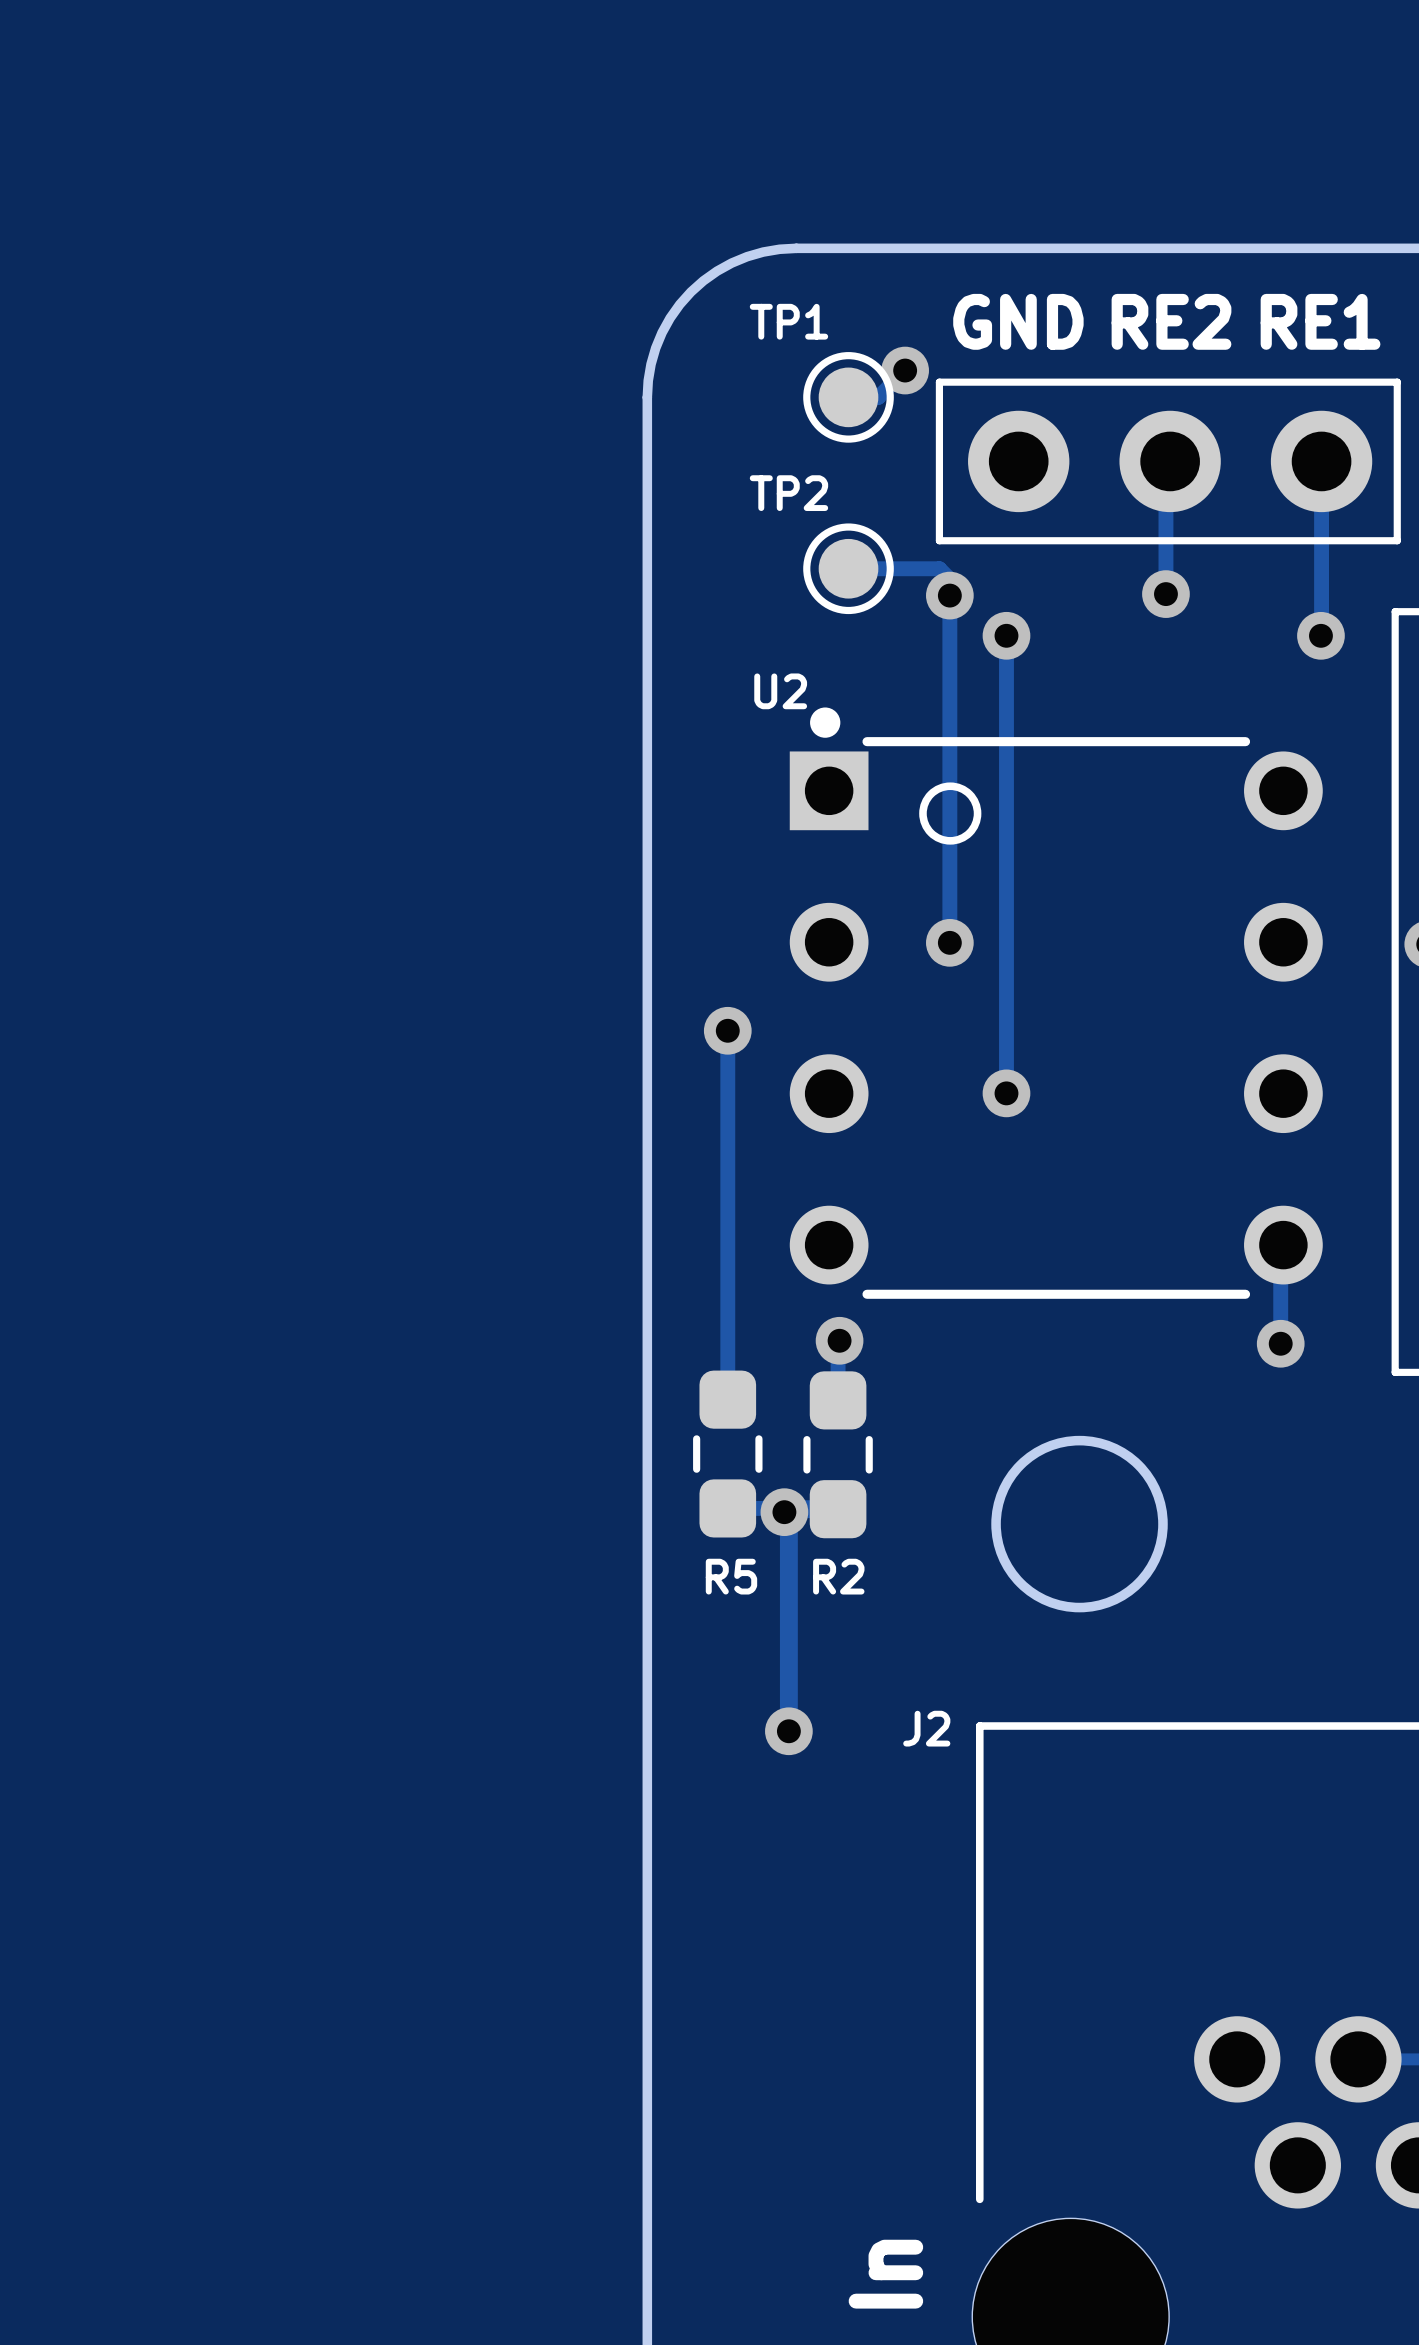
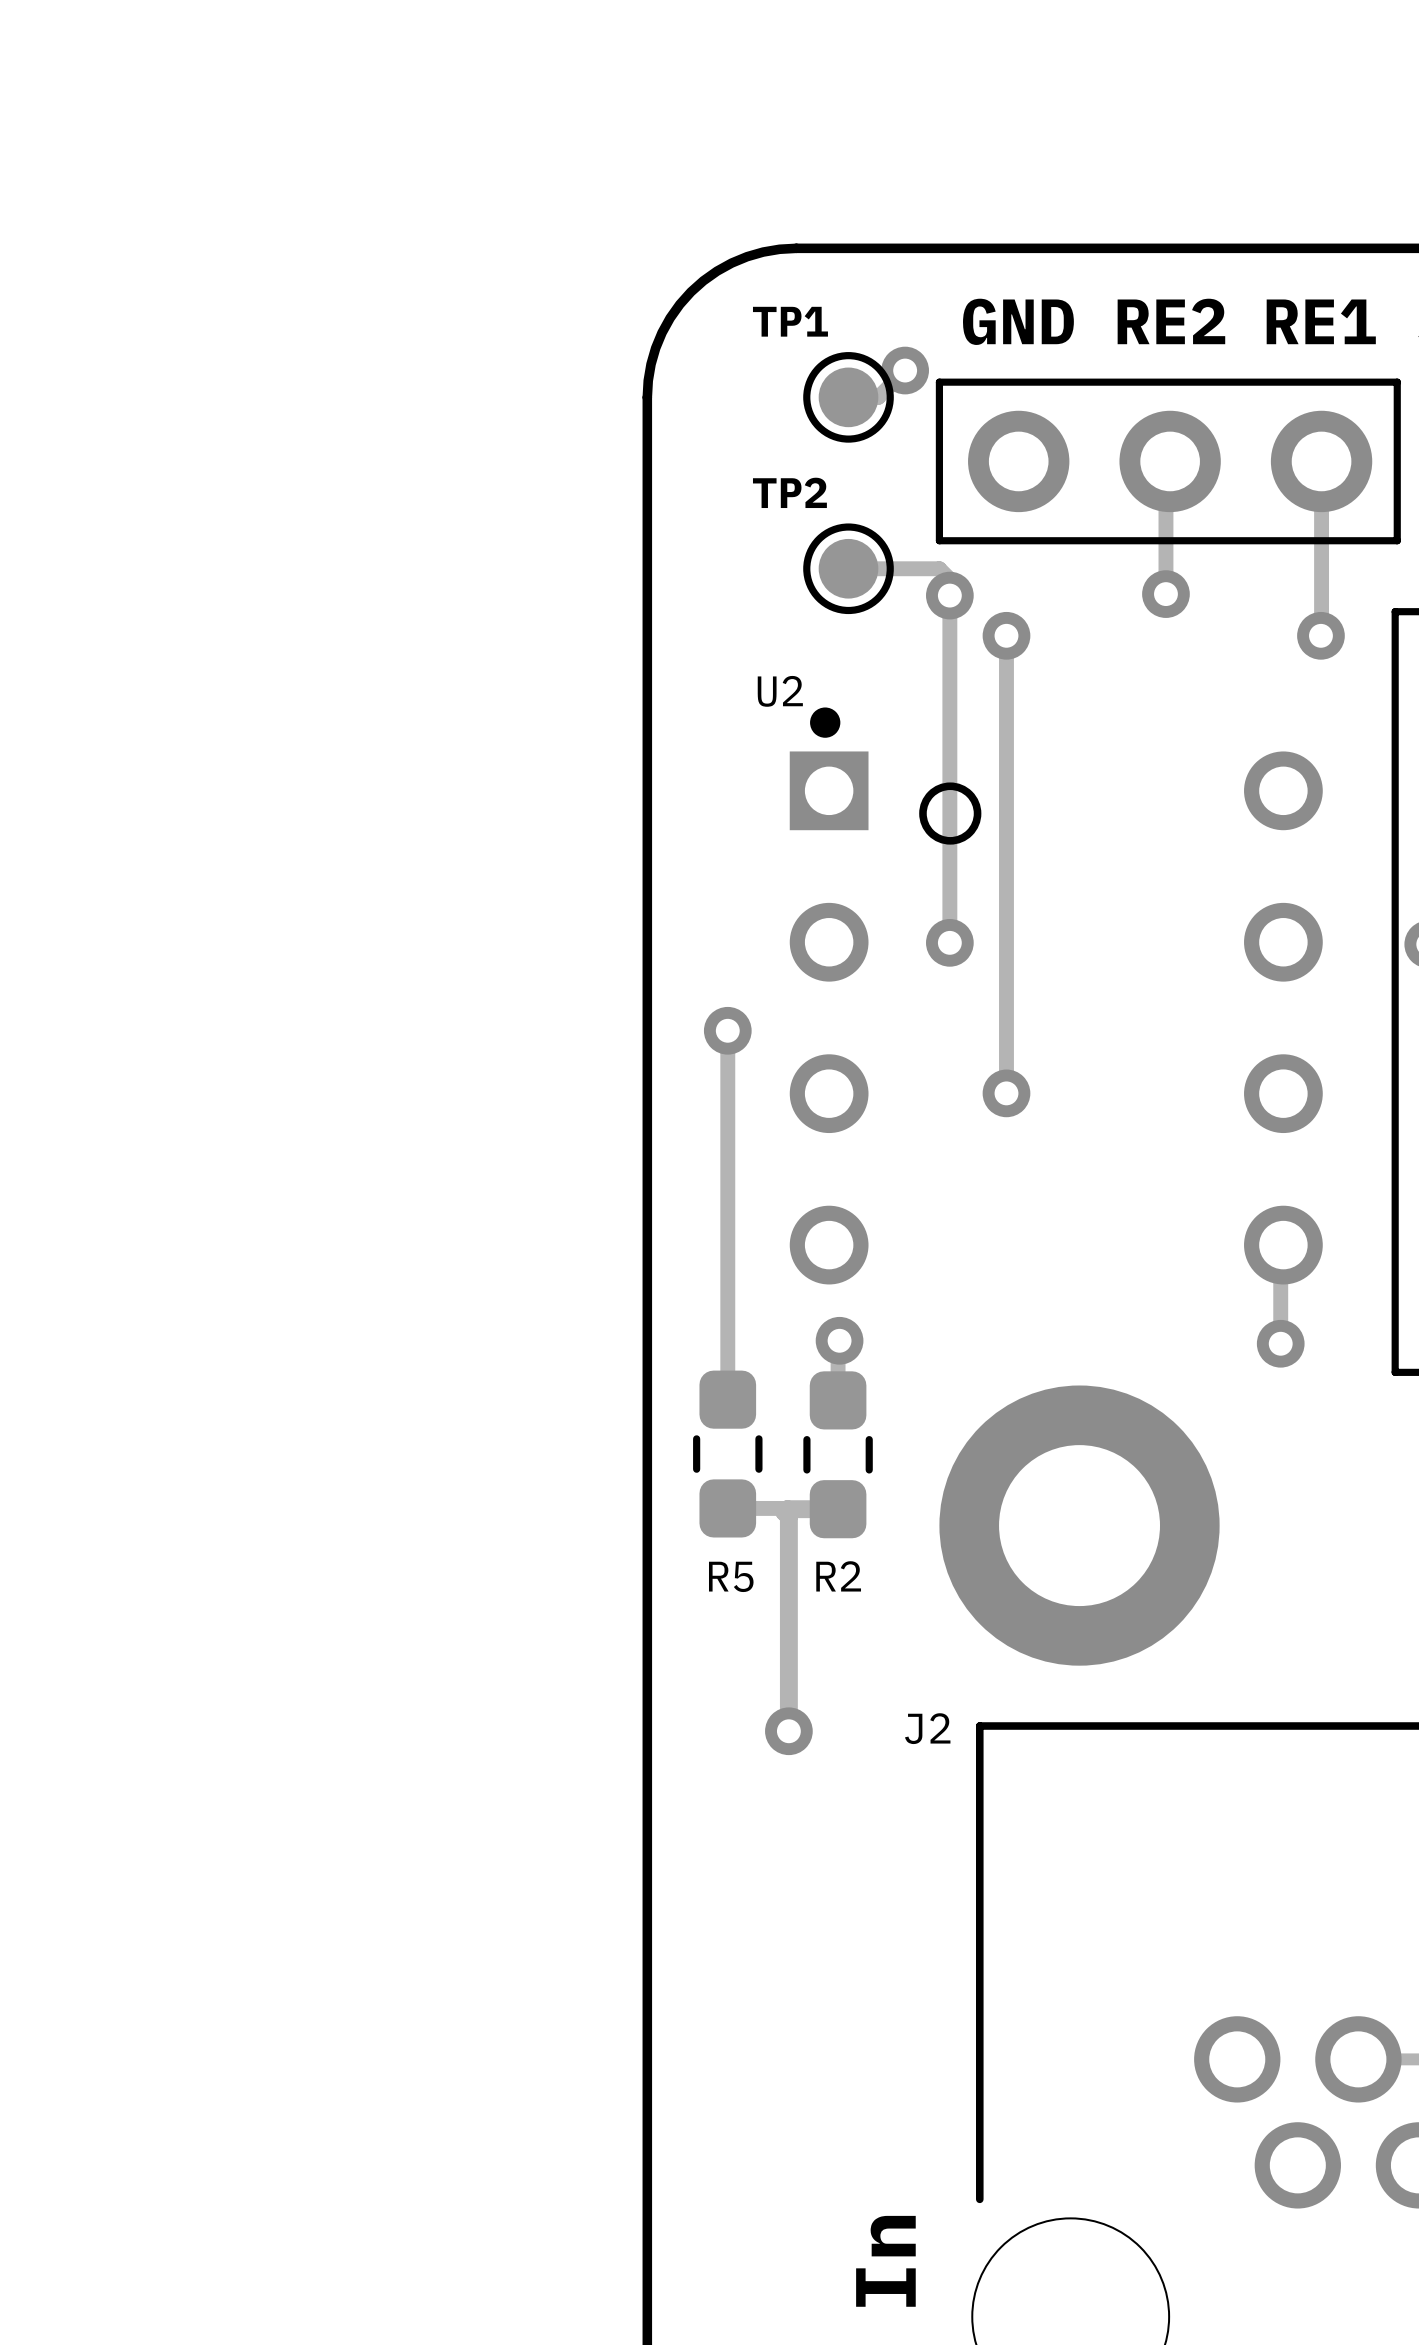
U2 footprint: [789, 707, 1323, 1299] -> [789, 707, 1323, 1285]
round board edge: [991, 1435, 1168, 1613] -> none
via: (784, 1512) -> none
part: none -> (1079, 1525)

